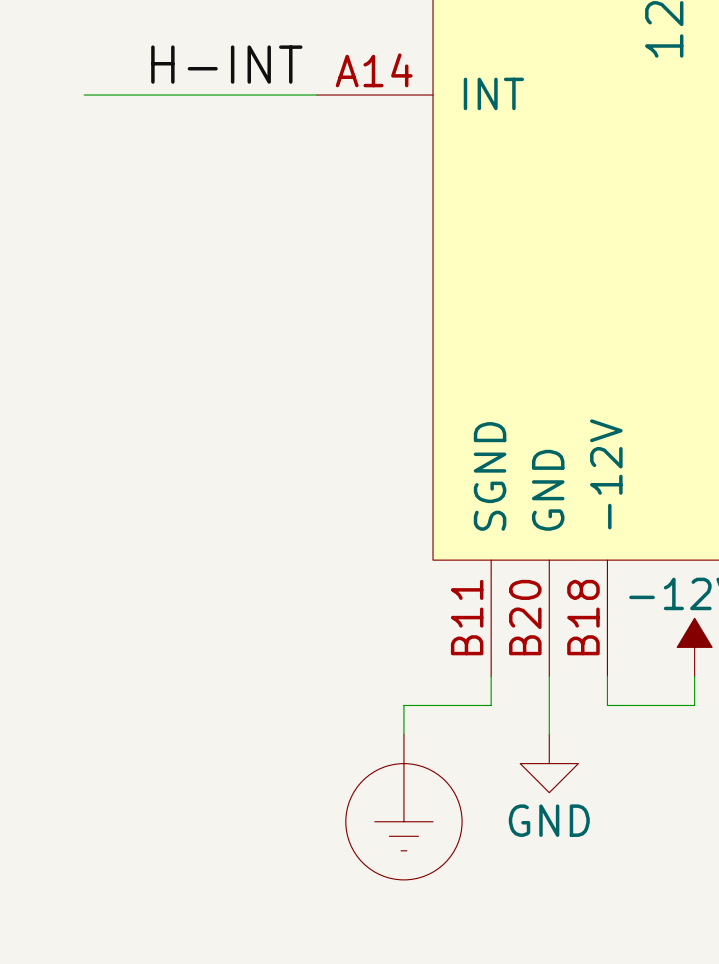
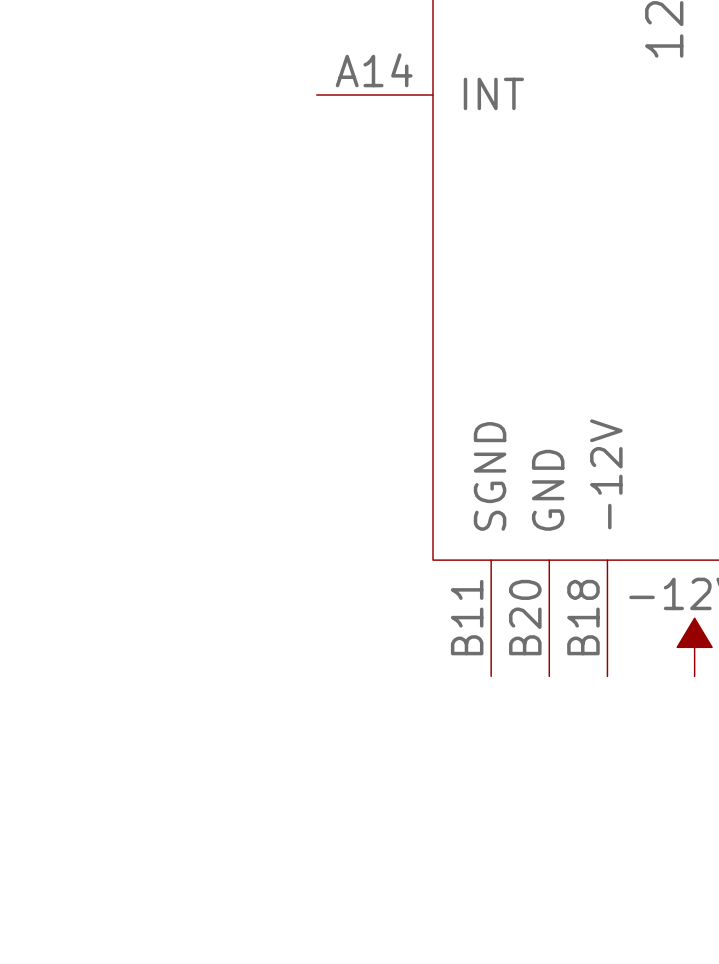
label: H-INT (226, 64) -> none
wire: (84, 95) (316, 95) -> none
wire: (491, 676) (491, 705) (403, 705) (403, 734) -> none
wire: (549, 676) (549, 734) -> none
wire: (607, 676) (607, 705) (694, 705) (694, 676) -> none
power symbol: GND (549, 763) -> none
power symbol: (403, 807) -> none

